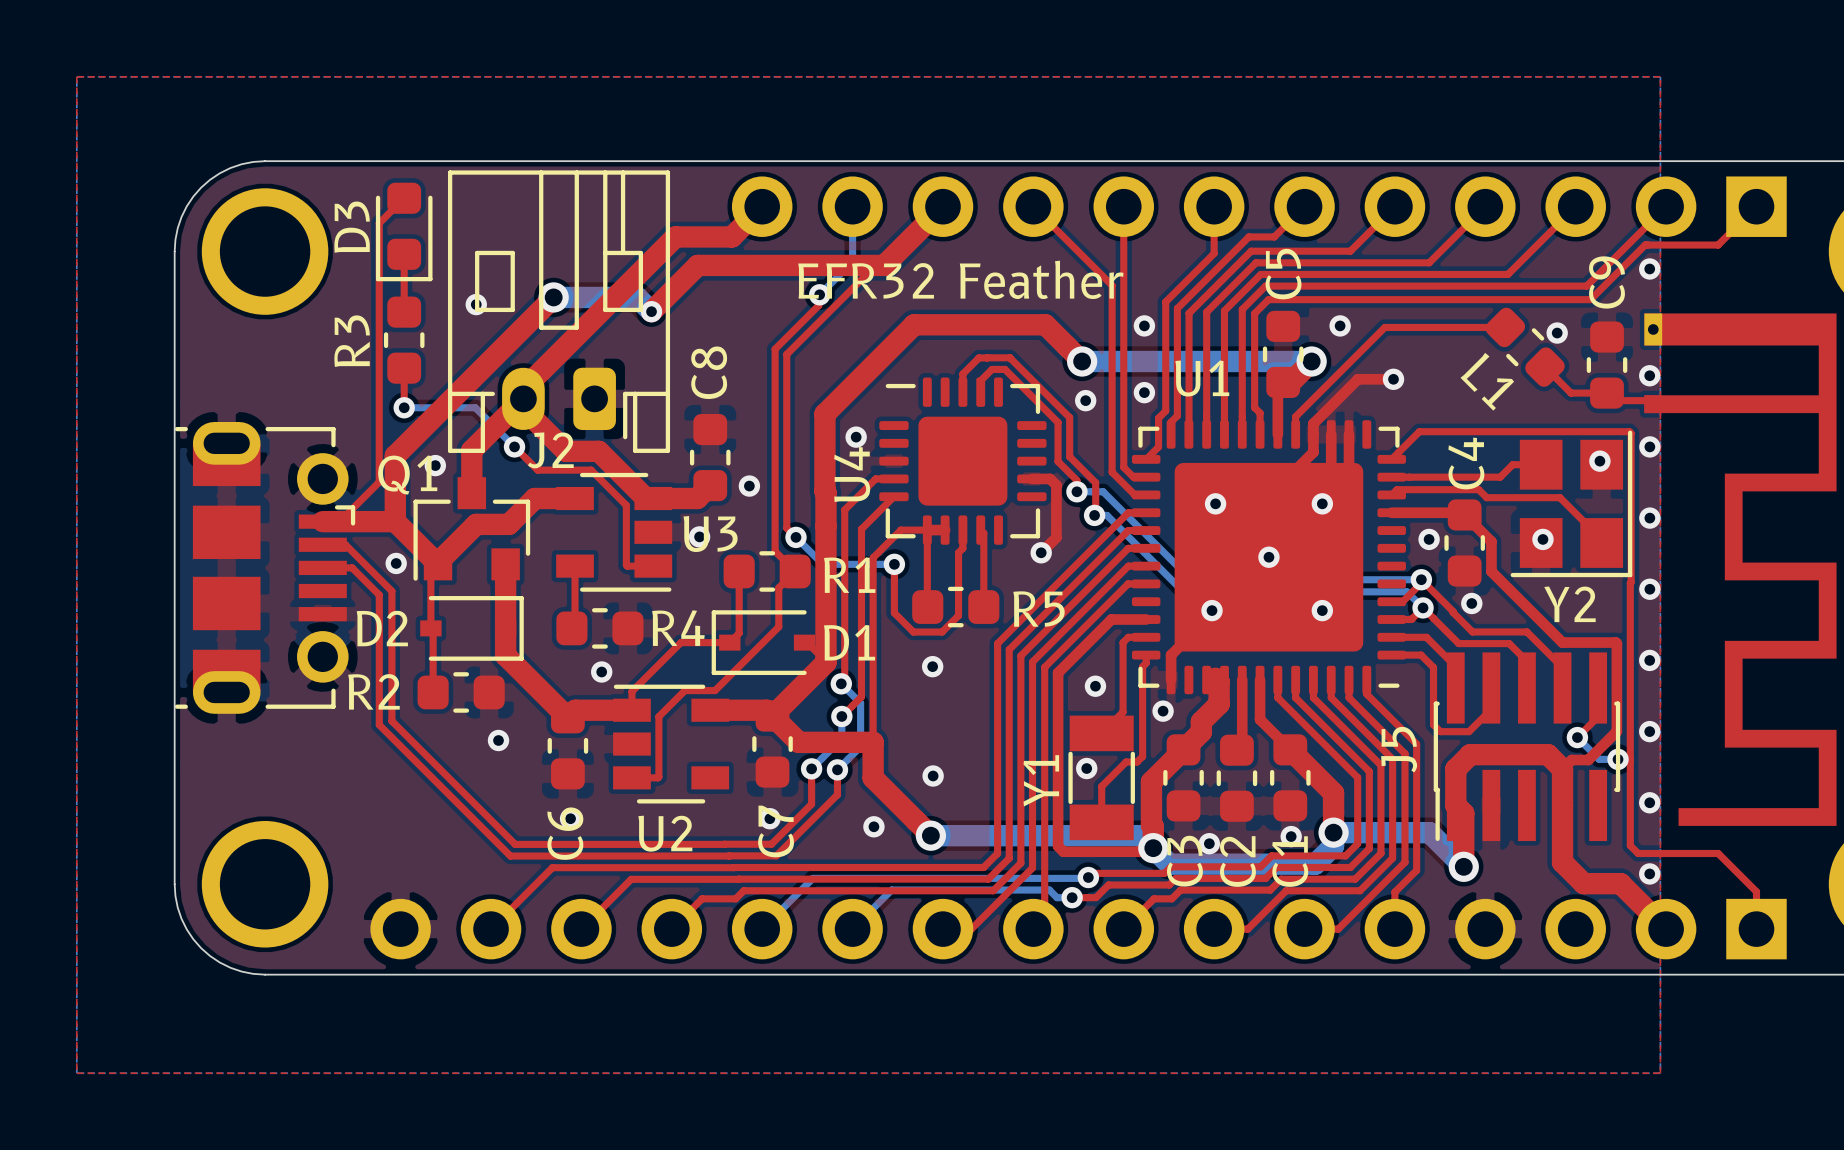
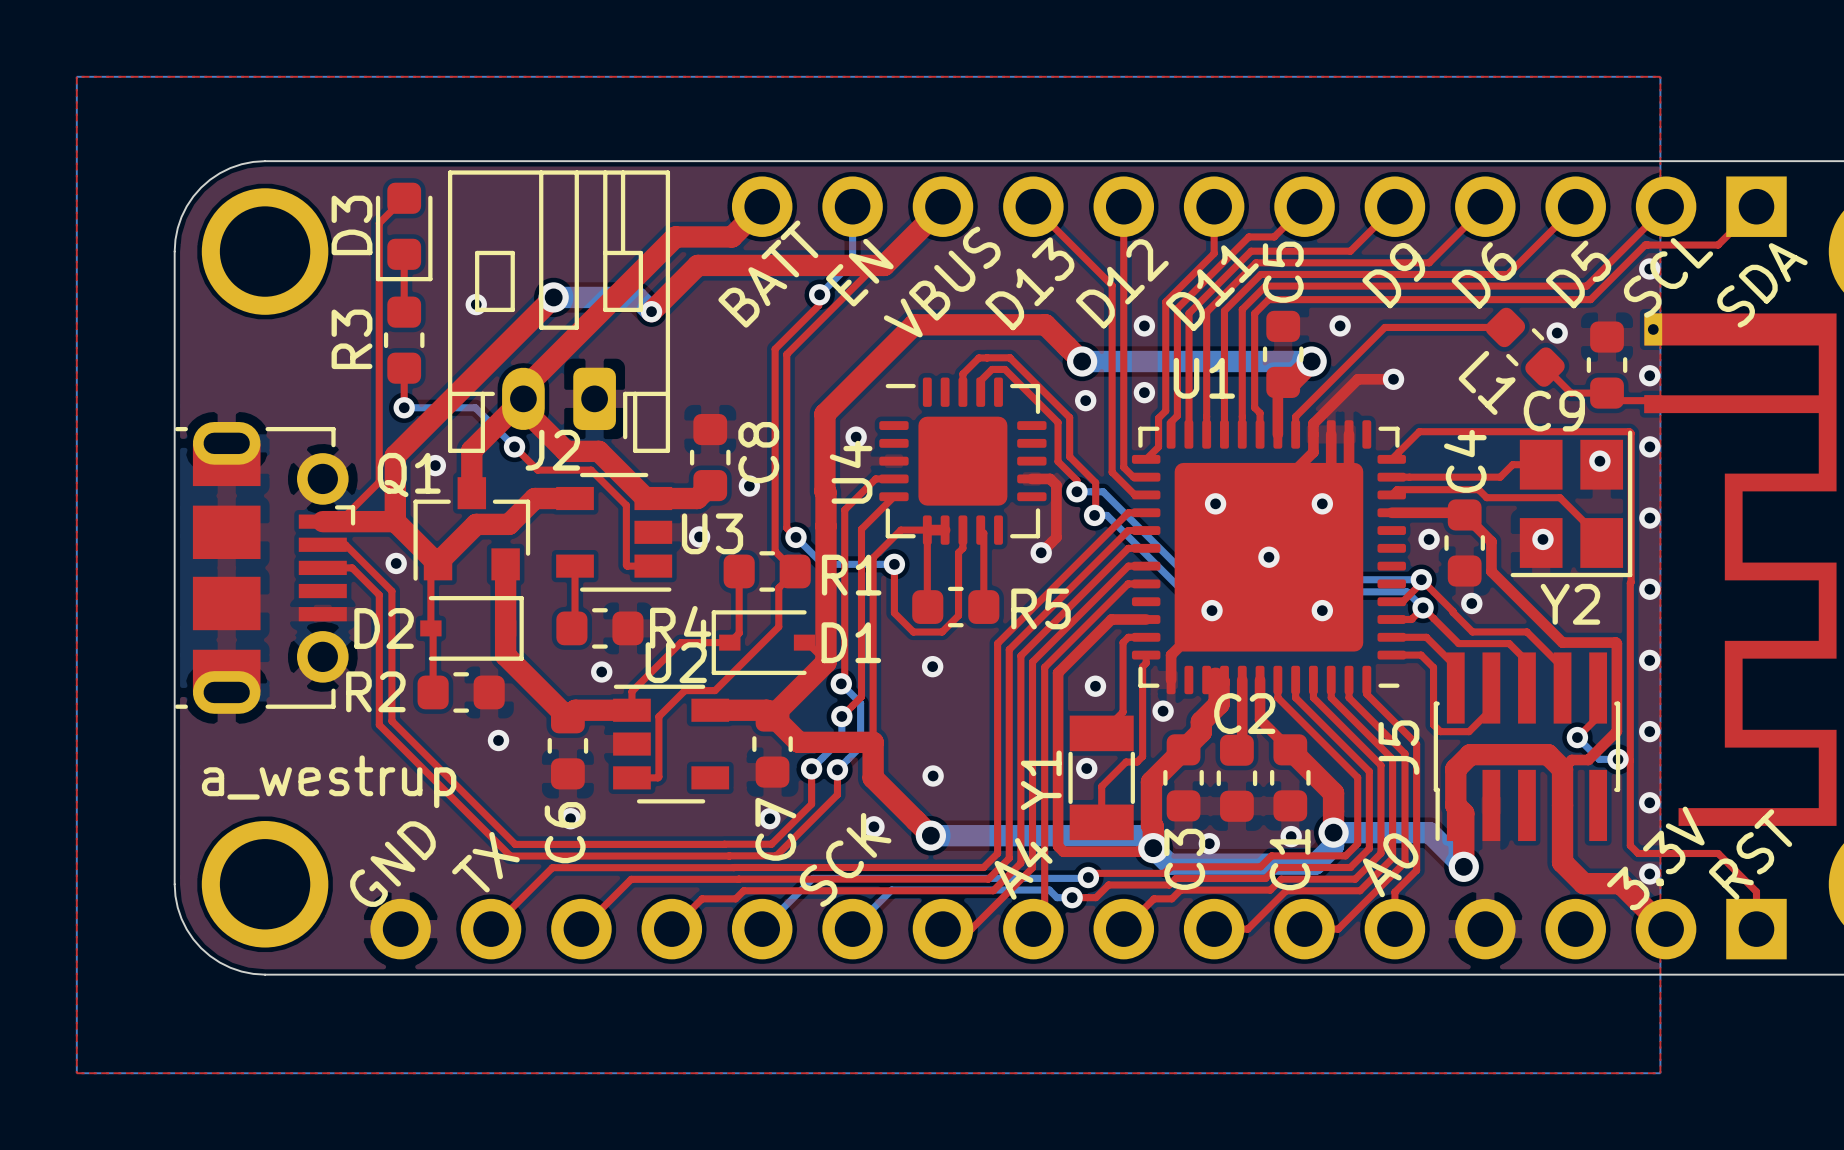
text: none -> EN (859, 272)
text: none -> BATT (768, 274)
text: none -> D5 (1578, 274)
text: none -> D9 (1393, 275)
text: none -> D6 (1484, 275)
text: none -> SCL (1668, 277)
text: EFR32 Feather (960, 279) -> VBUS (942, 282)
C9 name rotation: 0° (1606, 282) -> 90° clockwise (1554, 411)
C9 name position: C9 (1606, 282) -> C9 (1554, 411)
text: none -> D13 (1029, 283)
text: none -> D12 (1122, 283)
text: none -> SDA (1762, 285)
text: none -> D11 (1212, 288)
C8 name position: C8 (709, 372) -> C8 (758, 452)
text: none -> a_westrup (329, 781)
U2 name position: U2 (665, 833) -> U2 (676, 662)
text: none -> RST (1750, 854)
text: none -> SCK (845, 859)
text: none -> 3.3V (1655, 858)
C2 name rotation: 0° (1237, 861) -> 90° clockwise (1244, 713)
C2 name position: C2 (1237, 861) -> C2 (1244, 713)
text: none -> TX (485, 862)
text: none -> GND (392, 864)
text: none -> A0 (1390, 865)
text: none -> A4 (1023, 868)

